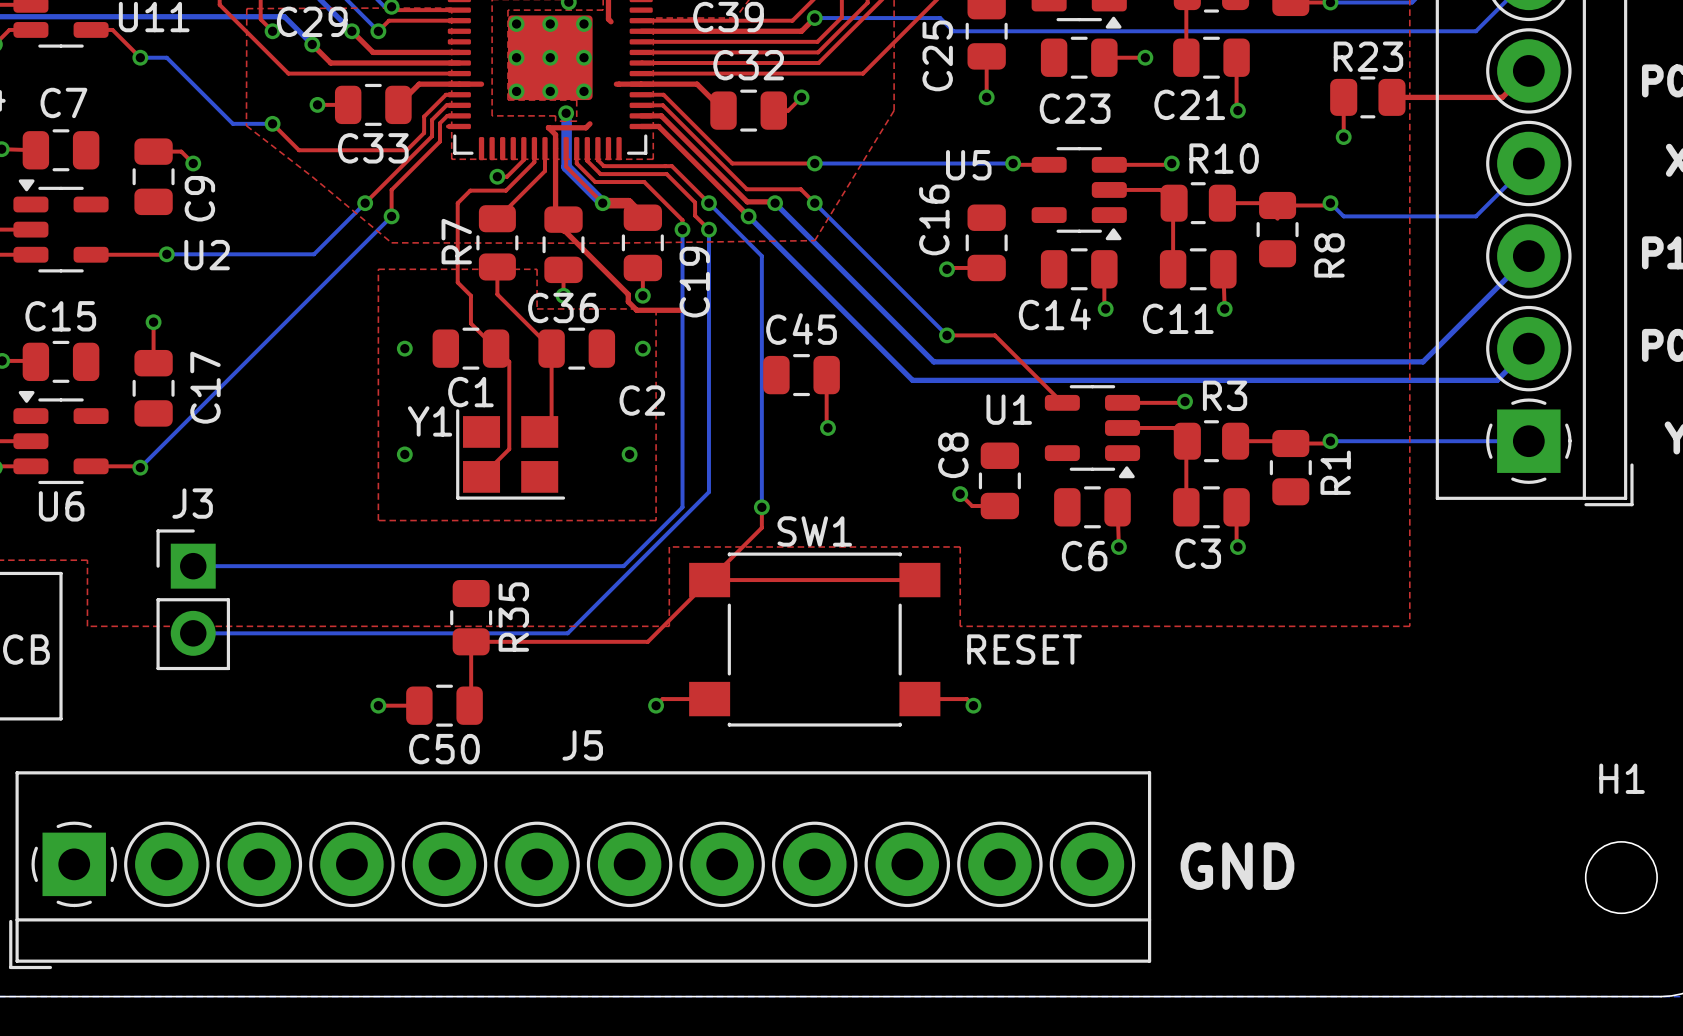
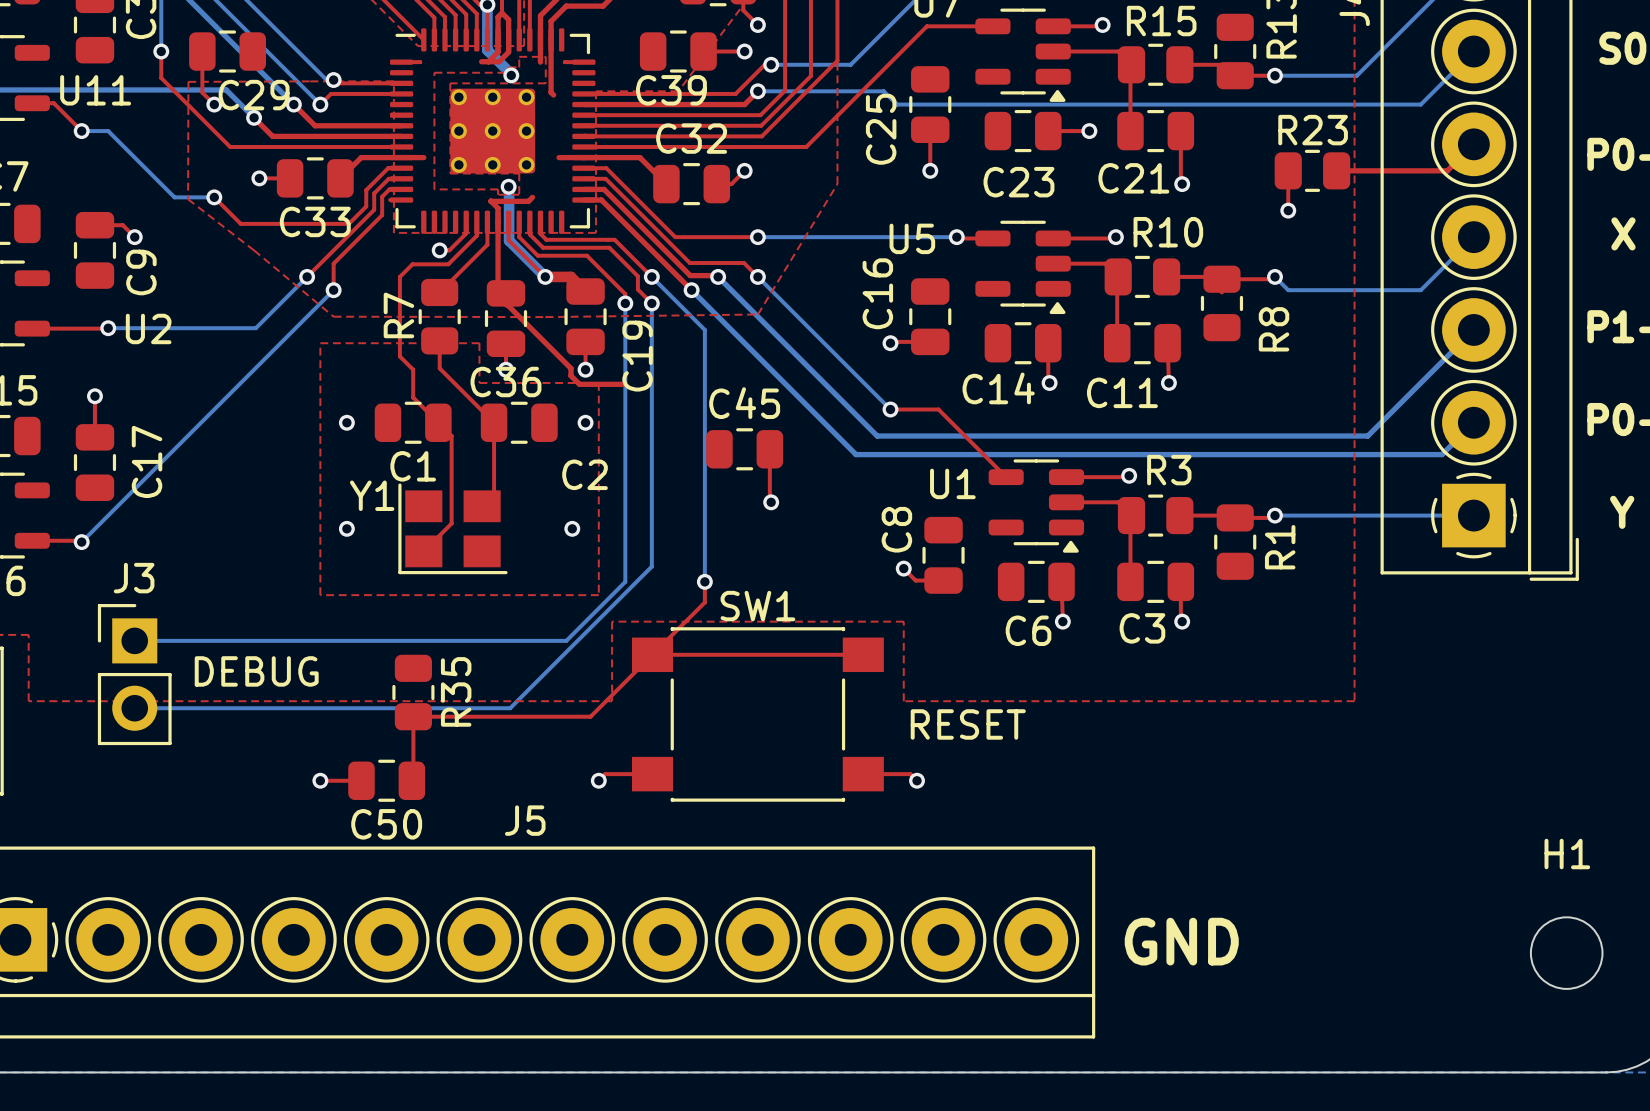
text: none -> DEBUG (256, 671)

